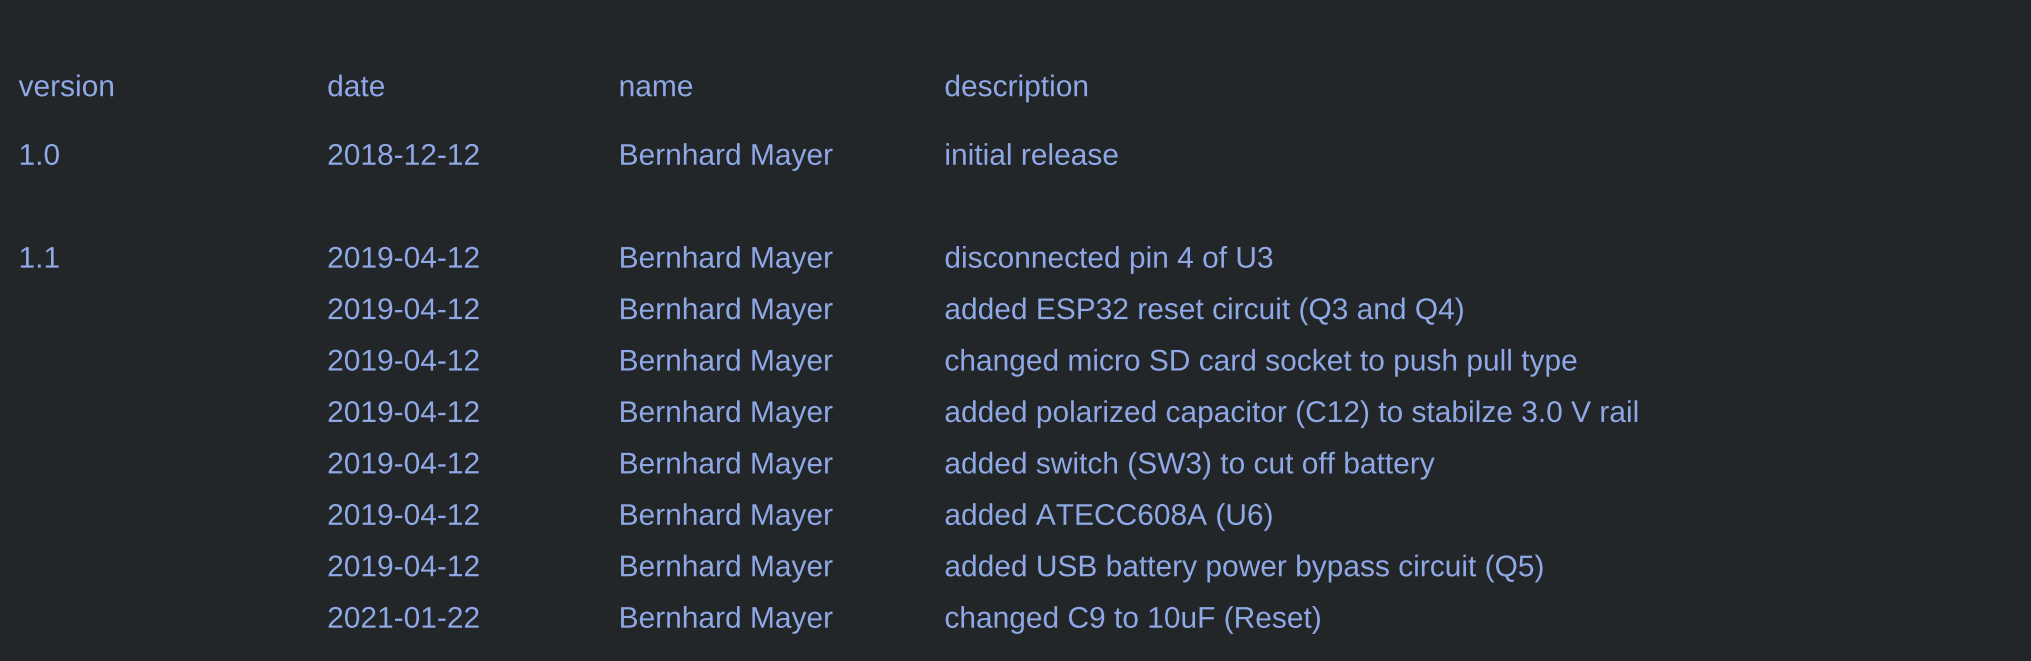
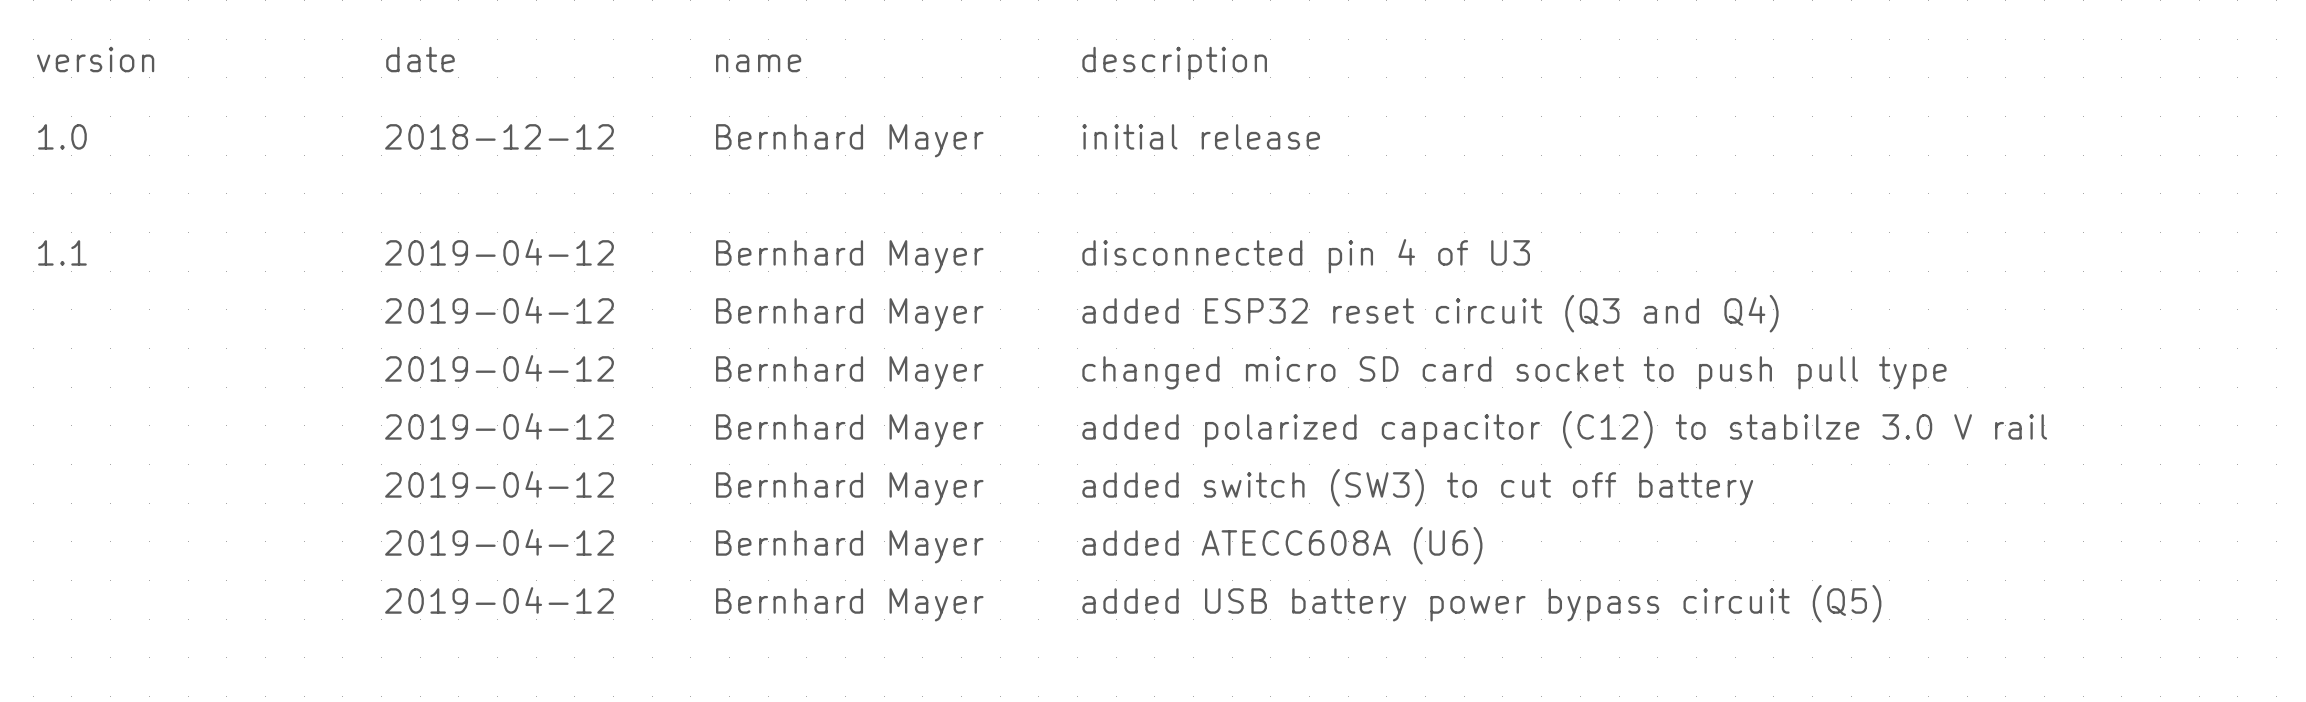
text: 2021-01-22 (403, 617) -> none
text: Bernhard Mayer (726, 619) -> none
text: changed C9 to 10uF (Reset) (1132, 619) -> none

